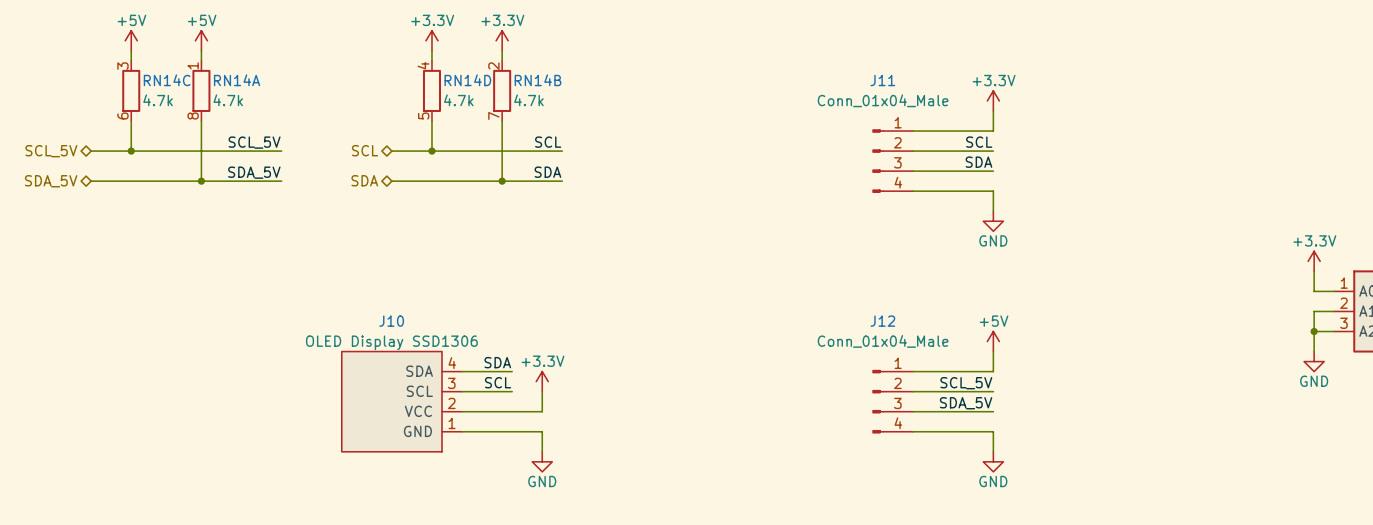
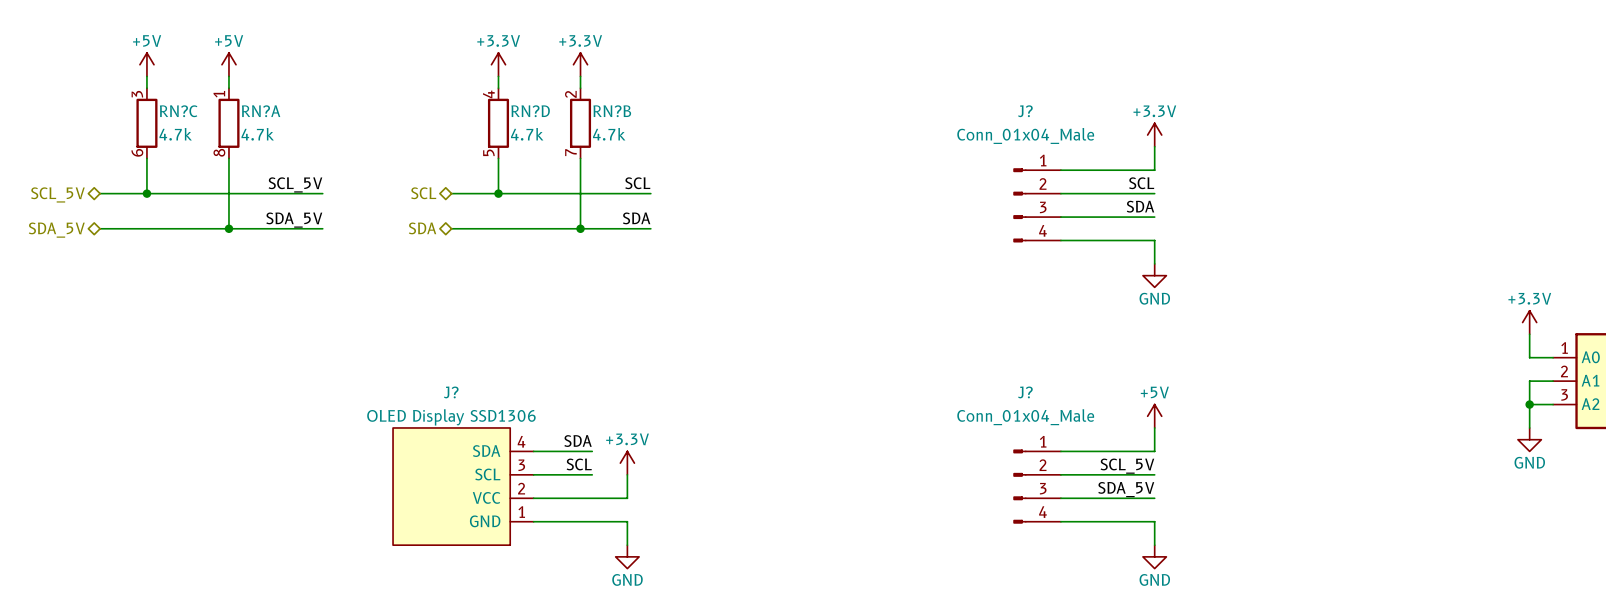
RN14C name: RN14C (167, 80) -> RN?C (178, 111)
RN14A name: RN14A (237, 80) -> RN?A (261, 111)
RN14D name: RN14D (467, 80) -> RN?D (530, 111)
RN14B name: RN14B (538, 80) -> RN?B (612, 111)
J11 name: J11 (882, 80) -> J? (1025, 111)
J10 name: J10 (391, 321) -> J? (451, 392)
J12 name: J12 (882, 321) -> J? (1025, 392)

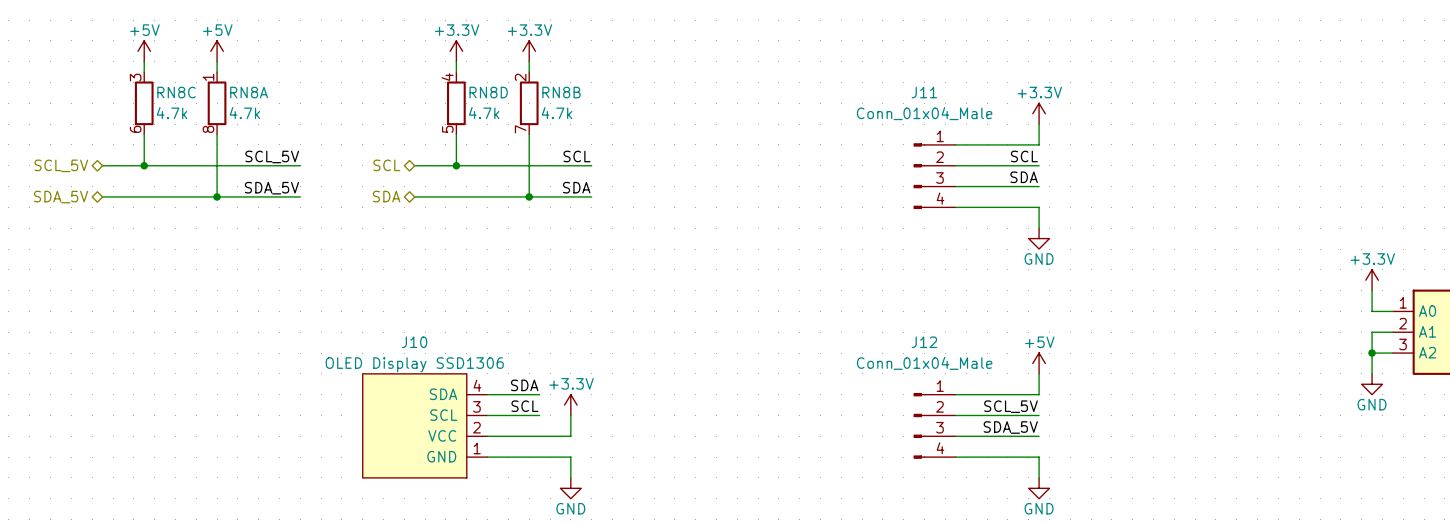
RN?C name: RN?C (178, 111) -> RN8C (176, 92)
RN?A name: RN?A (261, 111) -> RN8A (249, 92)
RN?D name: RN?D (530, 111) -> RN8D (488, 92)
RN?B name: RN?B (612, 111) -> RN8B (561, 92)
J? name: J? (1025, 111) -> J11 (924, 92)
J? name: J? (451, 392) -> J10 (414, 342)
J? name: J? (1025, 392) -> J12 (924, 342)

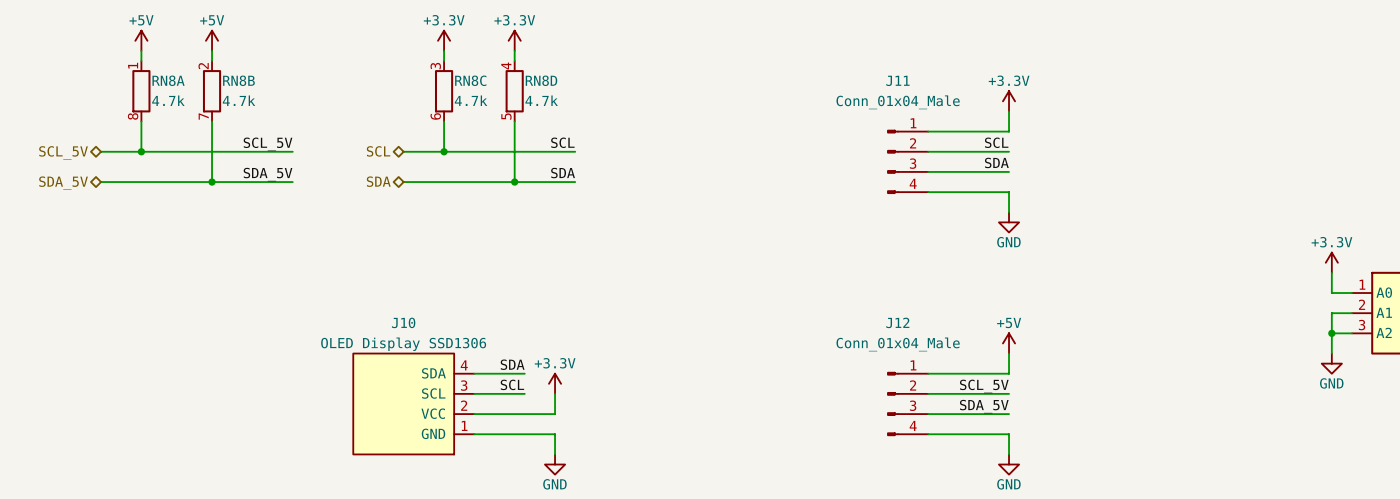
RN8C position: (144, 103) -> (444, 91)
RN8A position: (217, 103) -> (141, 91)
RN8D position: (456, 103) -> (514, 91)
RN8B position: (529, 103) -> (212, 91)

